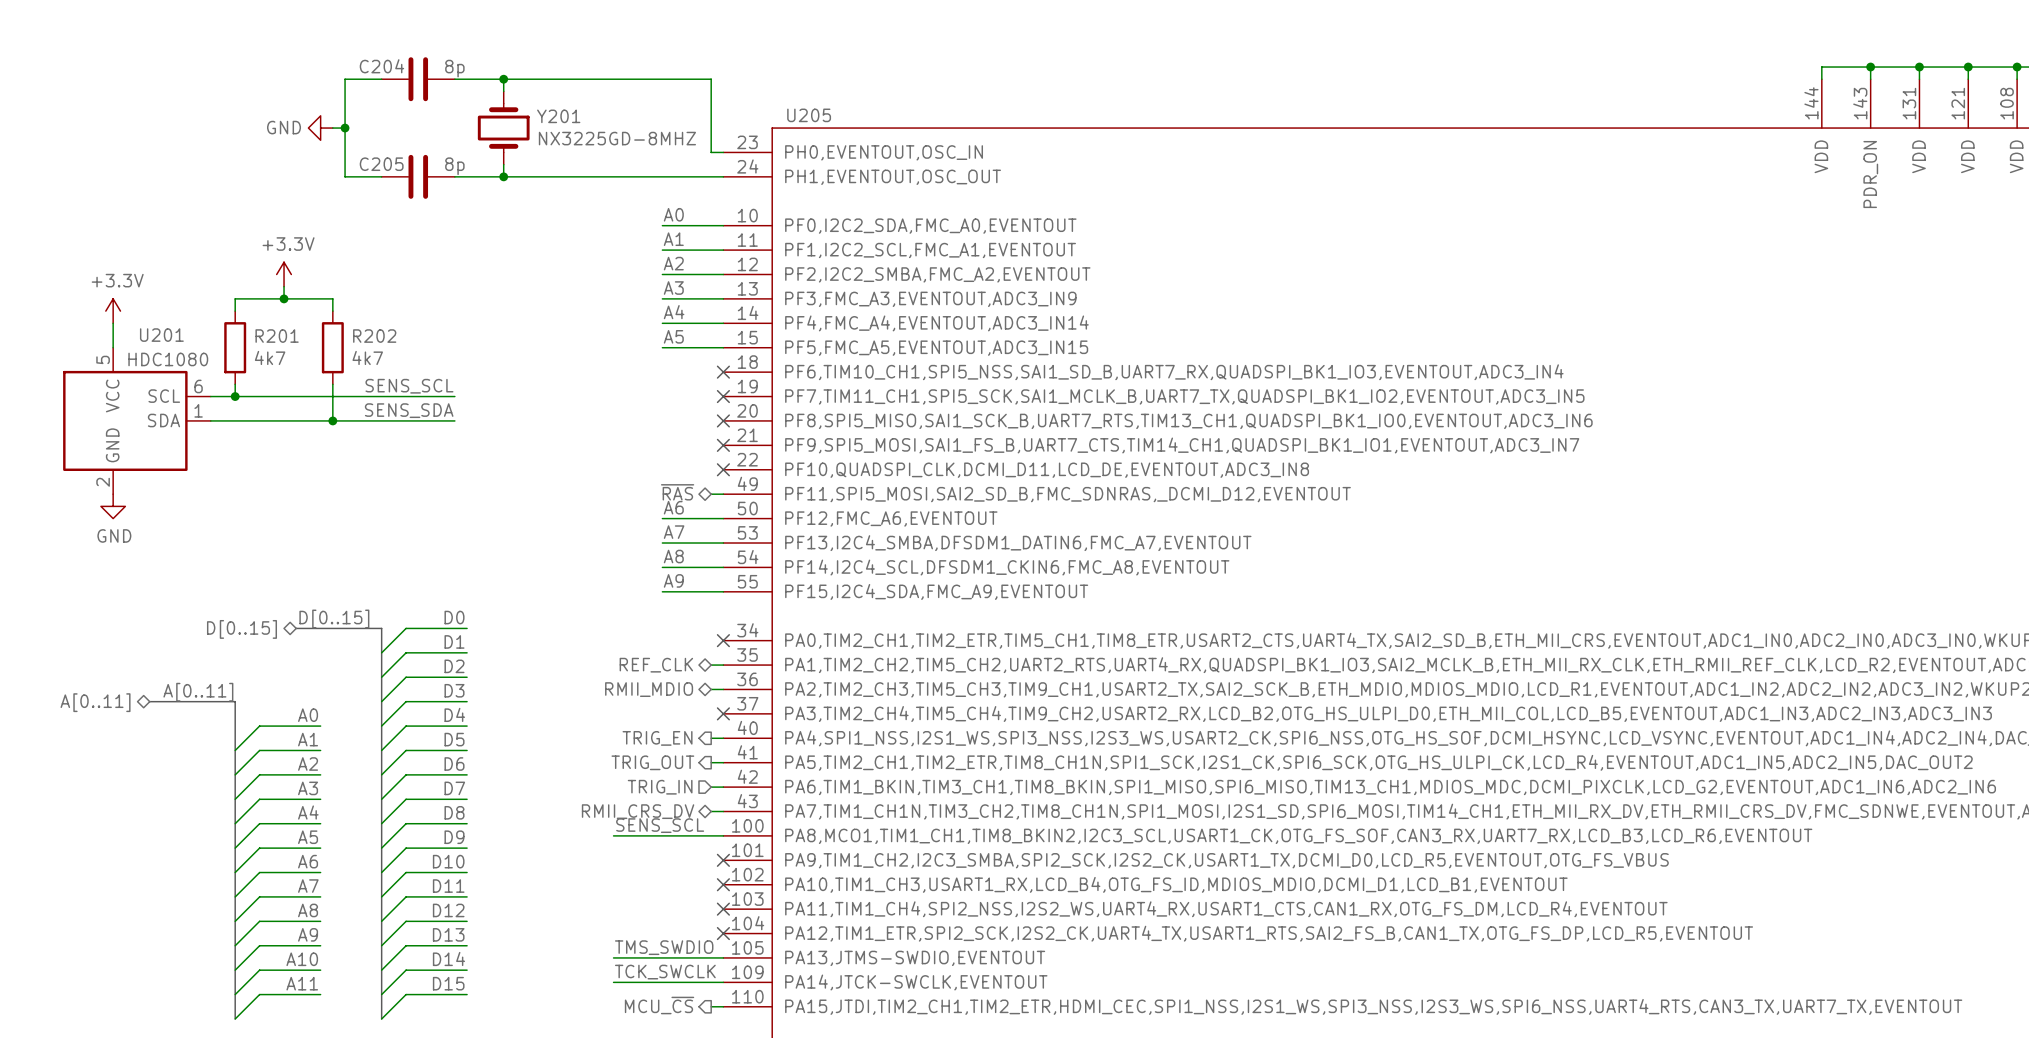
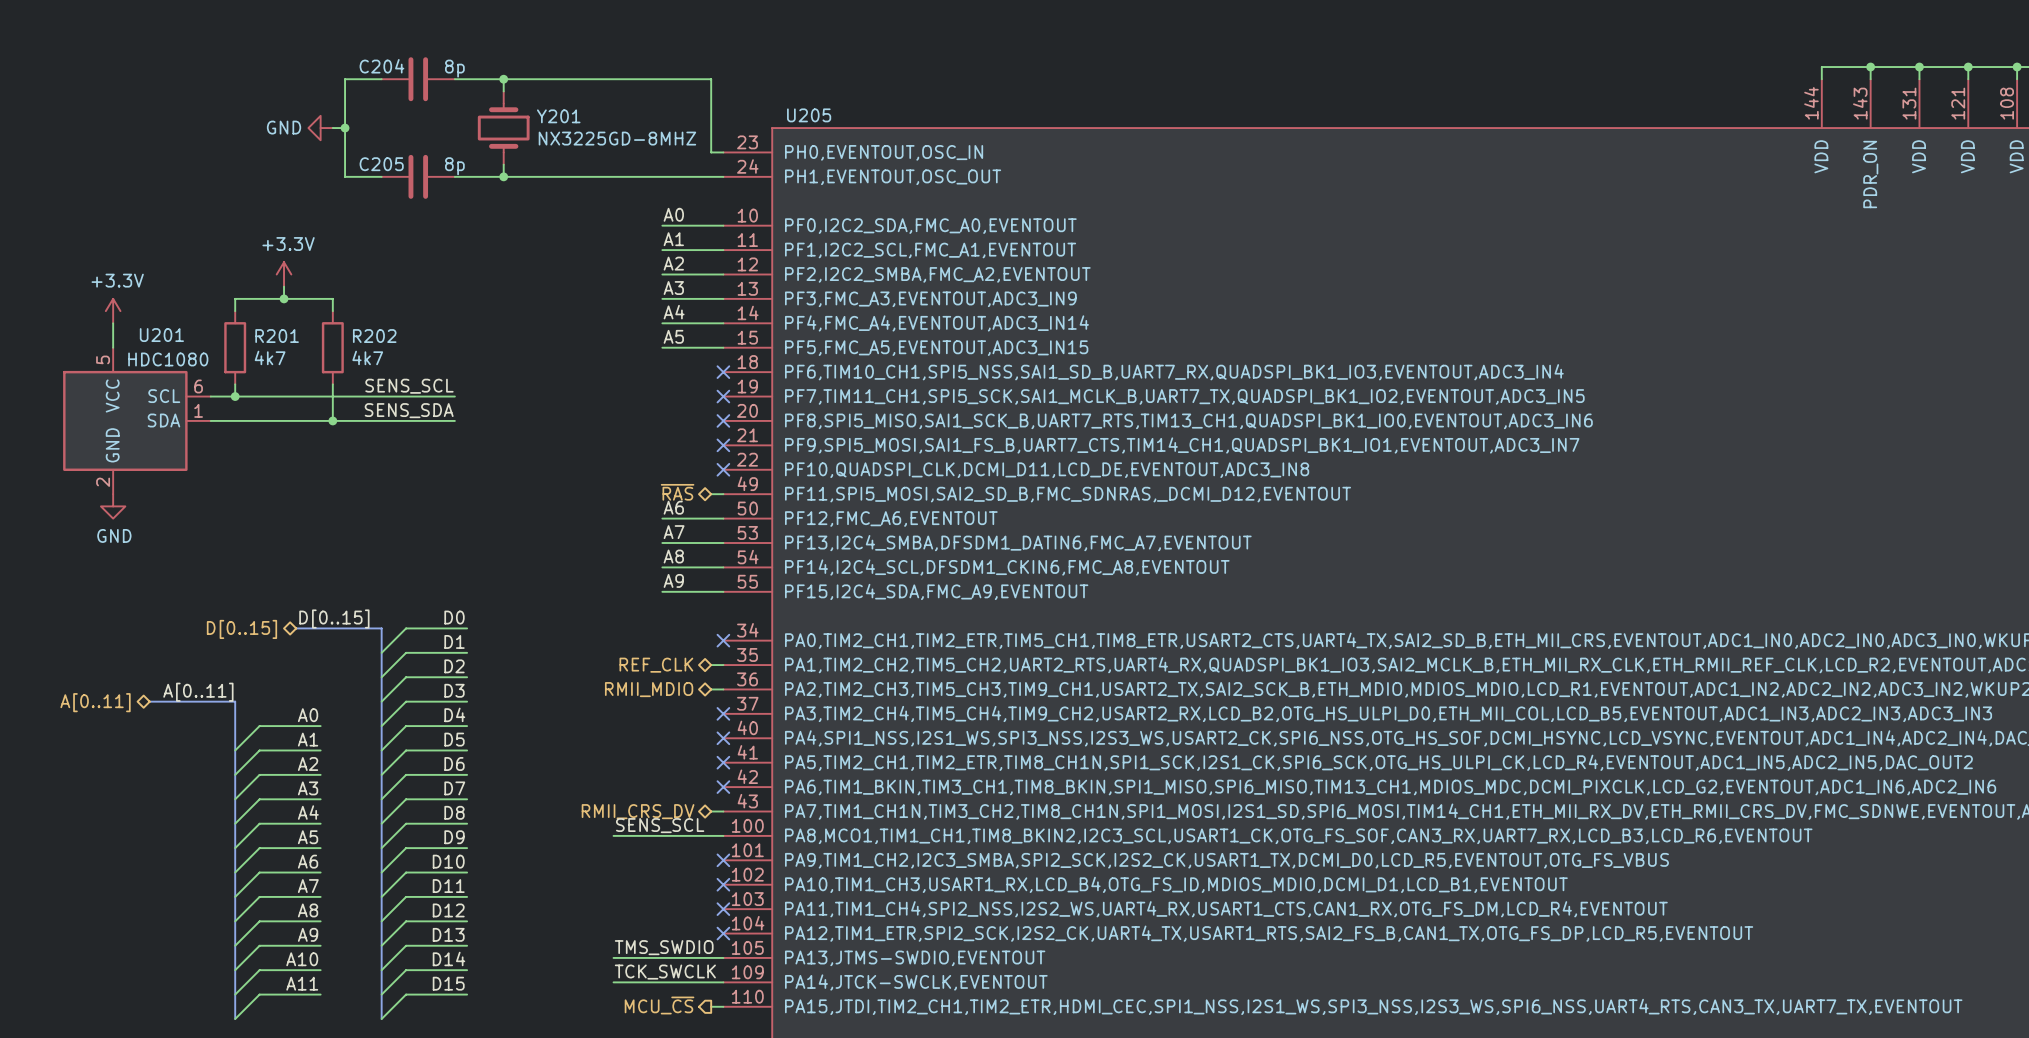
hierarchical label: TRIG_EN (657, 738) -> none
wire: (711, 738) (723, 738) -> none
no-connect mark: none -> (723, 738)
hierarchical label: TRIG_OUT (652, 762) -> none
wire: (711, 762) (723, 762) -> none
no-connect mark: none -> (723, 762)
hierarchical label: TRIG_IN (660, 787) -> none
wire: (711, 787) (723, 787) -> none
no-connect mark: none -> (723, 787)

